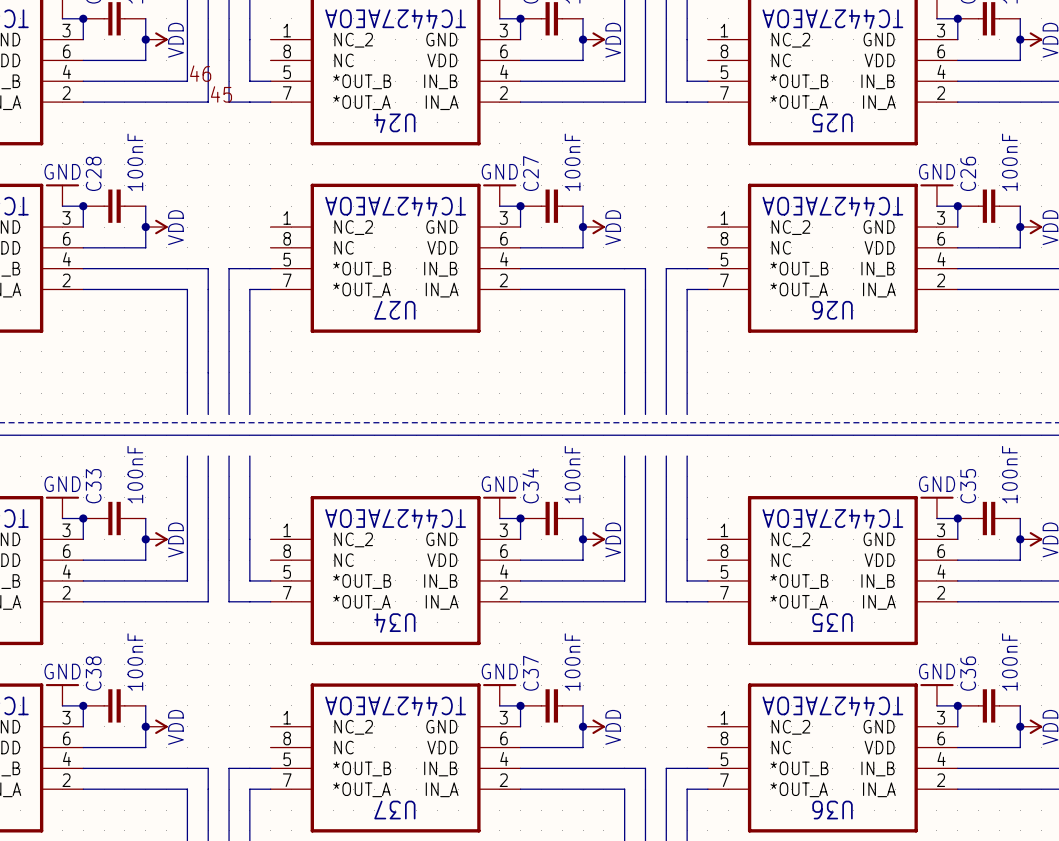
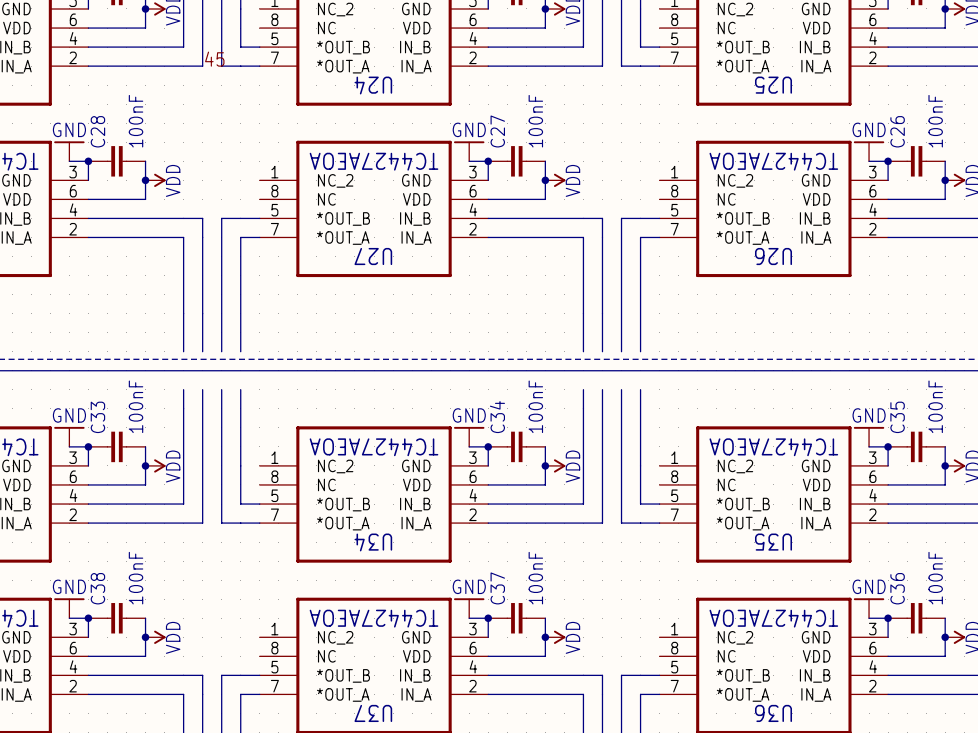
label: 46 (200, 73) -> none

